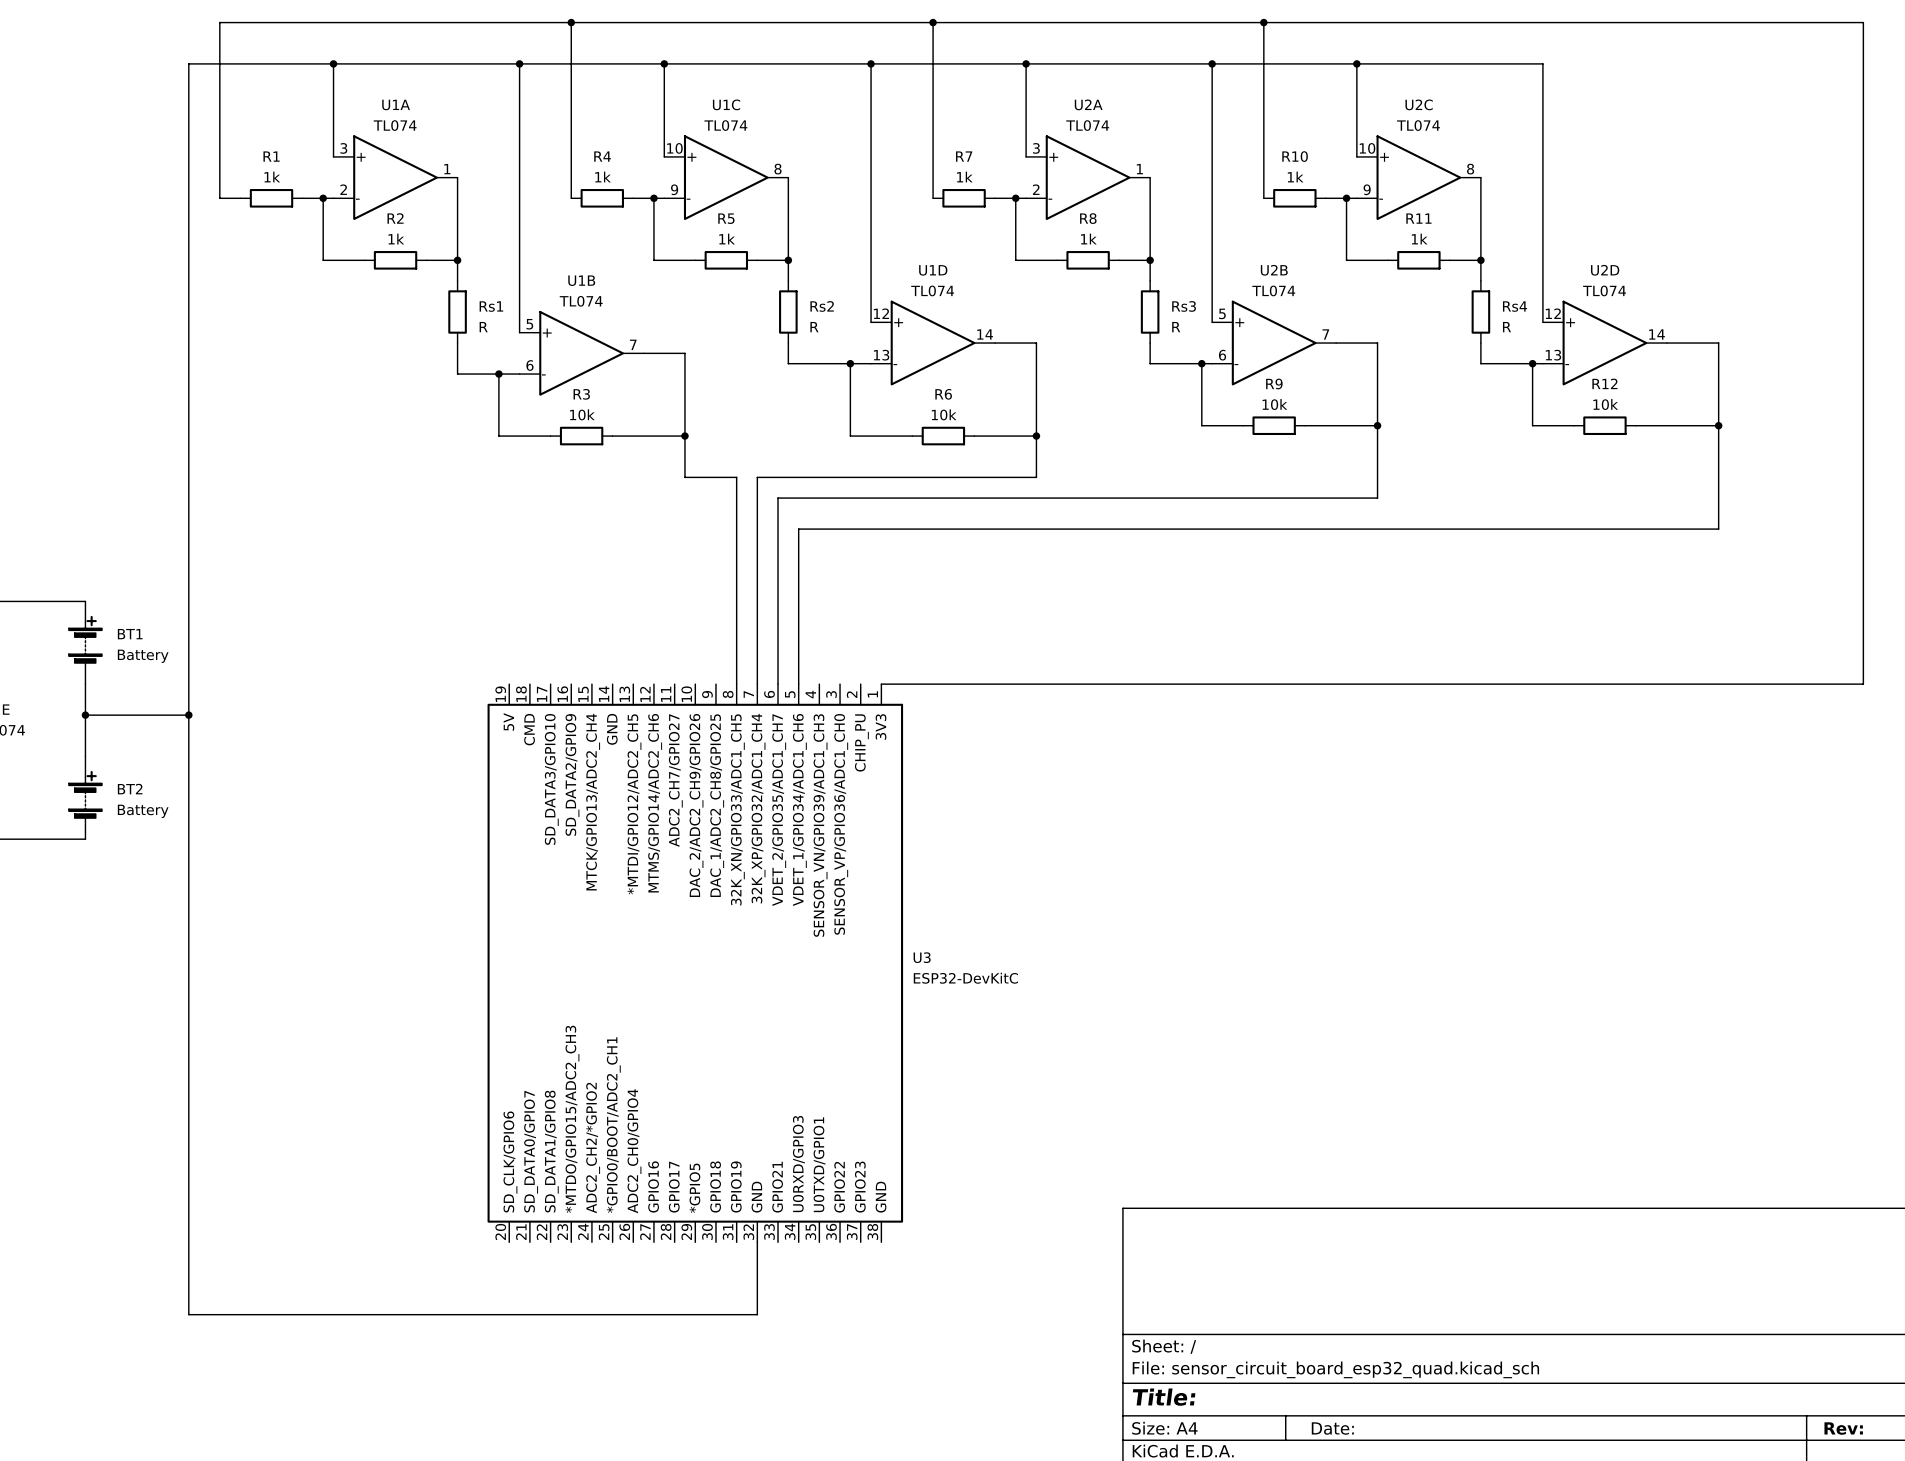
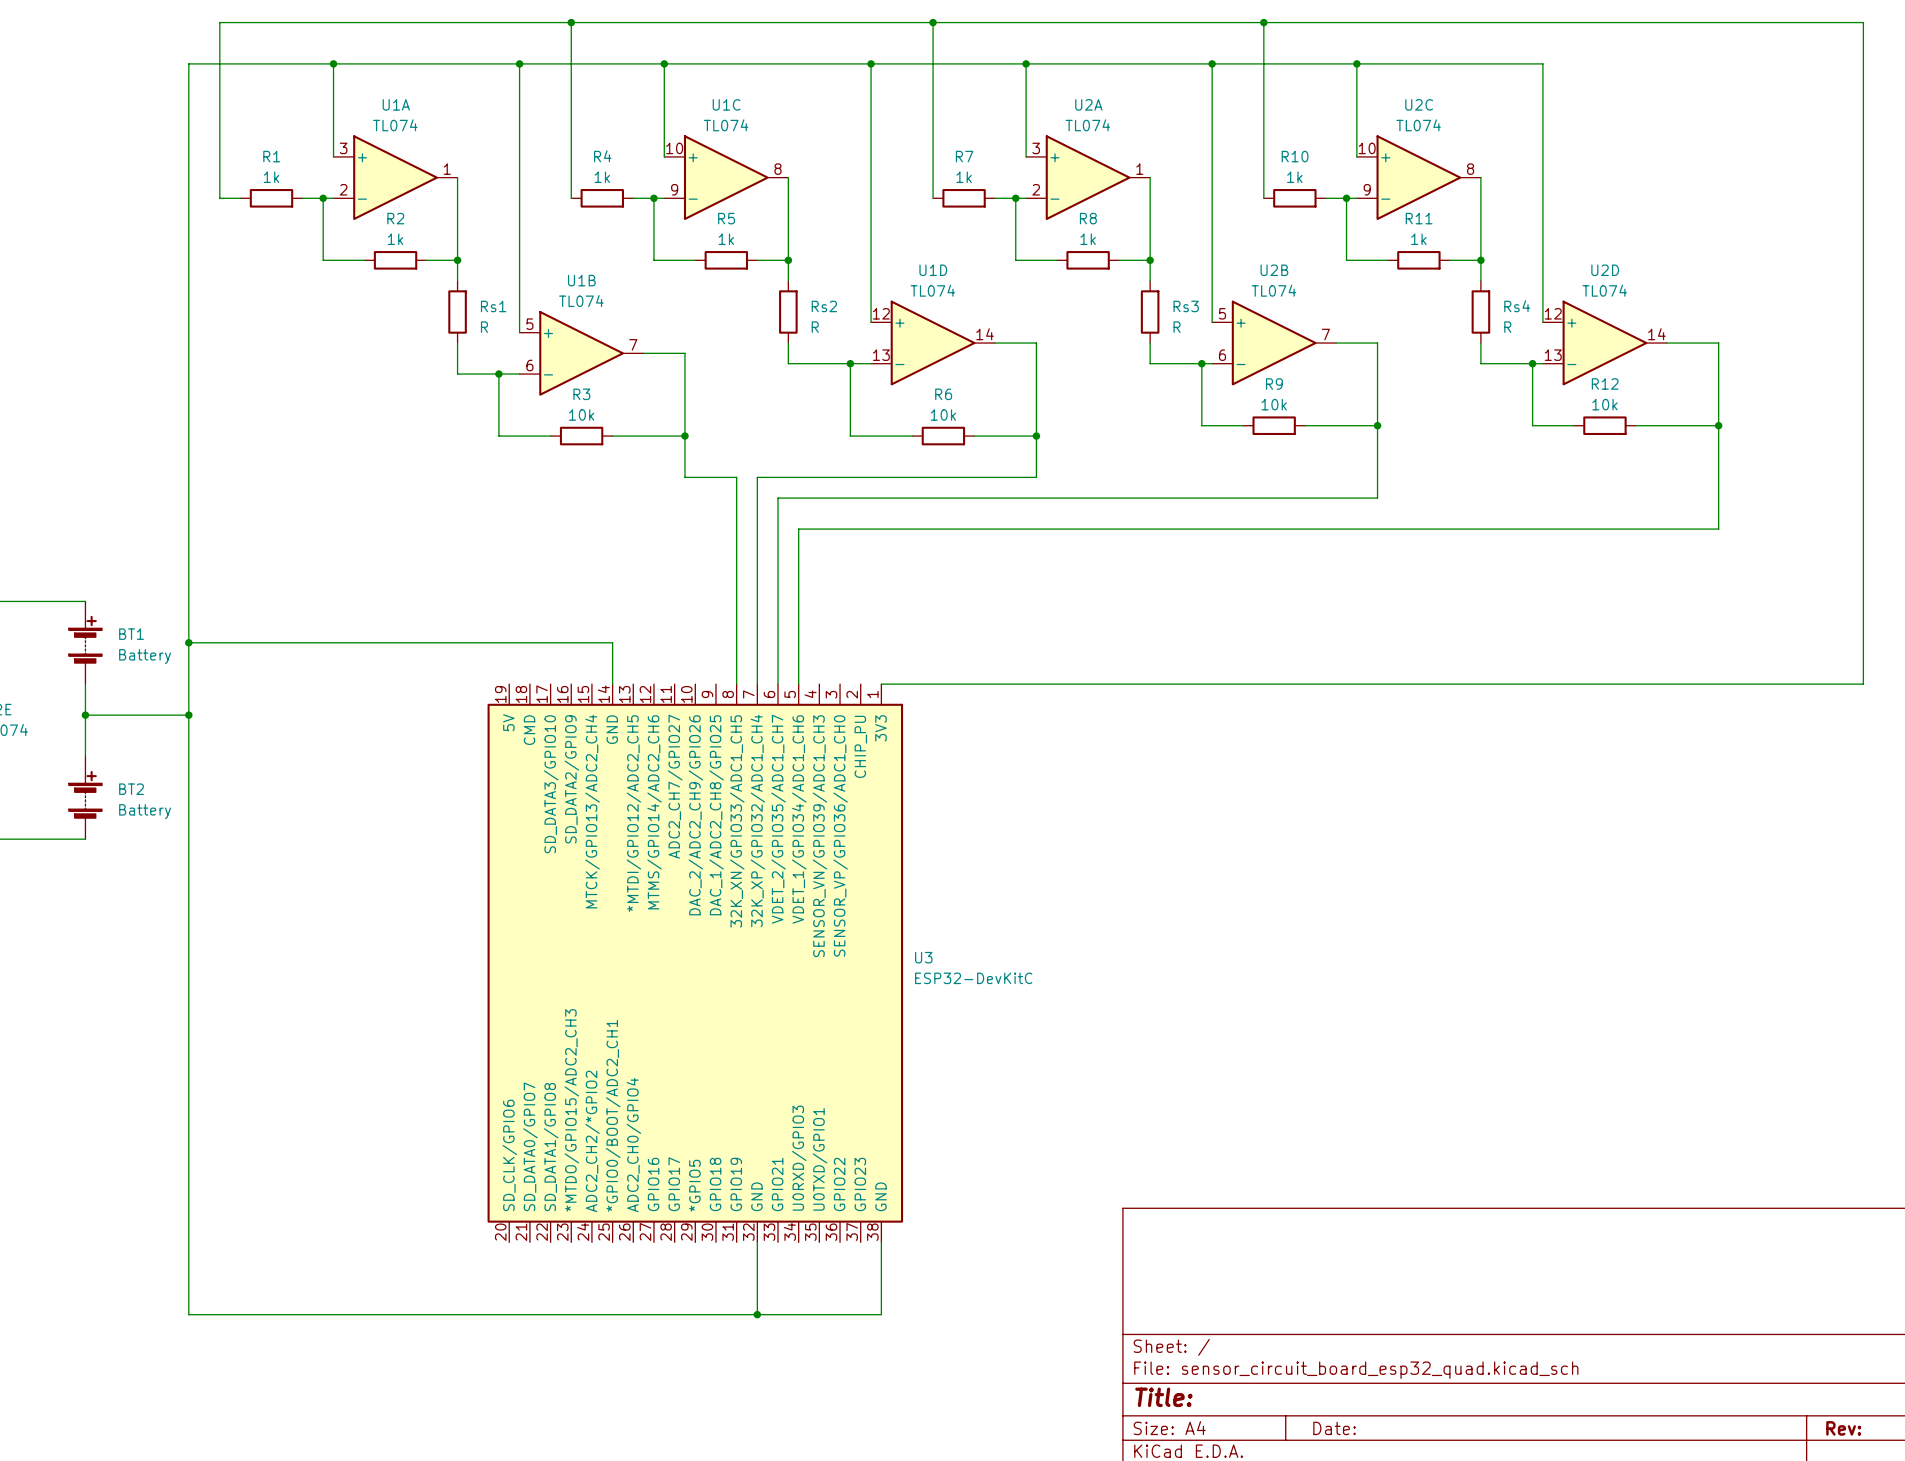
wire: none -> (188, 642) (612, 642) (612, 684)
junction: none -> (188, 642)
wire: none -> (881, 1242) (881, 1314) (757, 1314)
junction: none -> (757, 1314)

